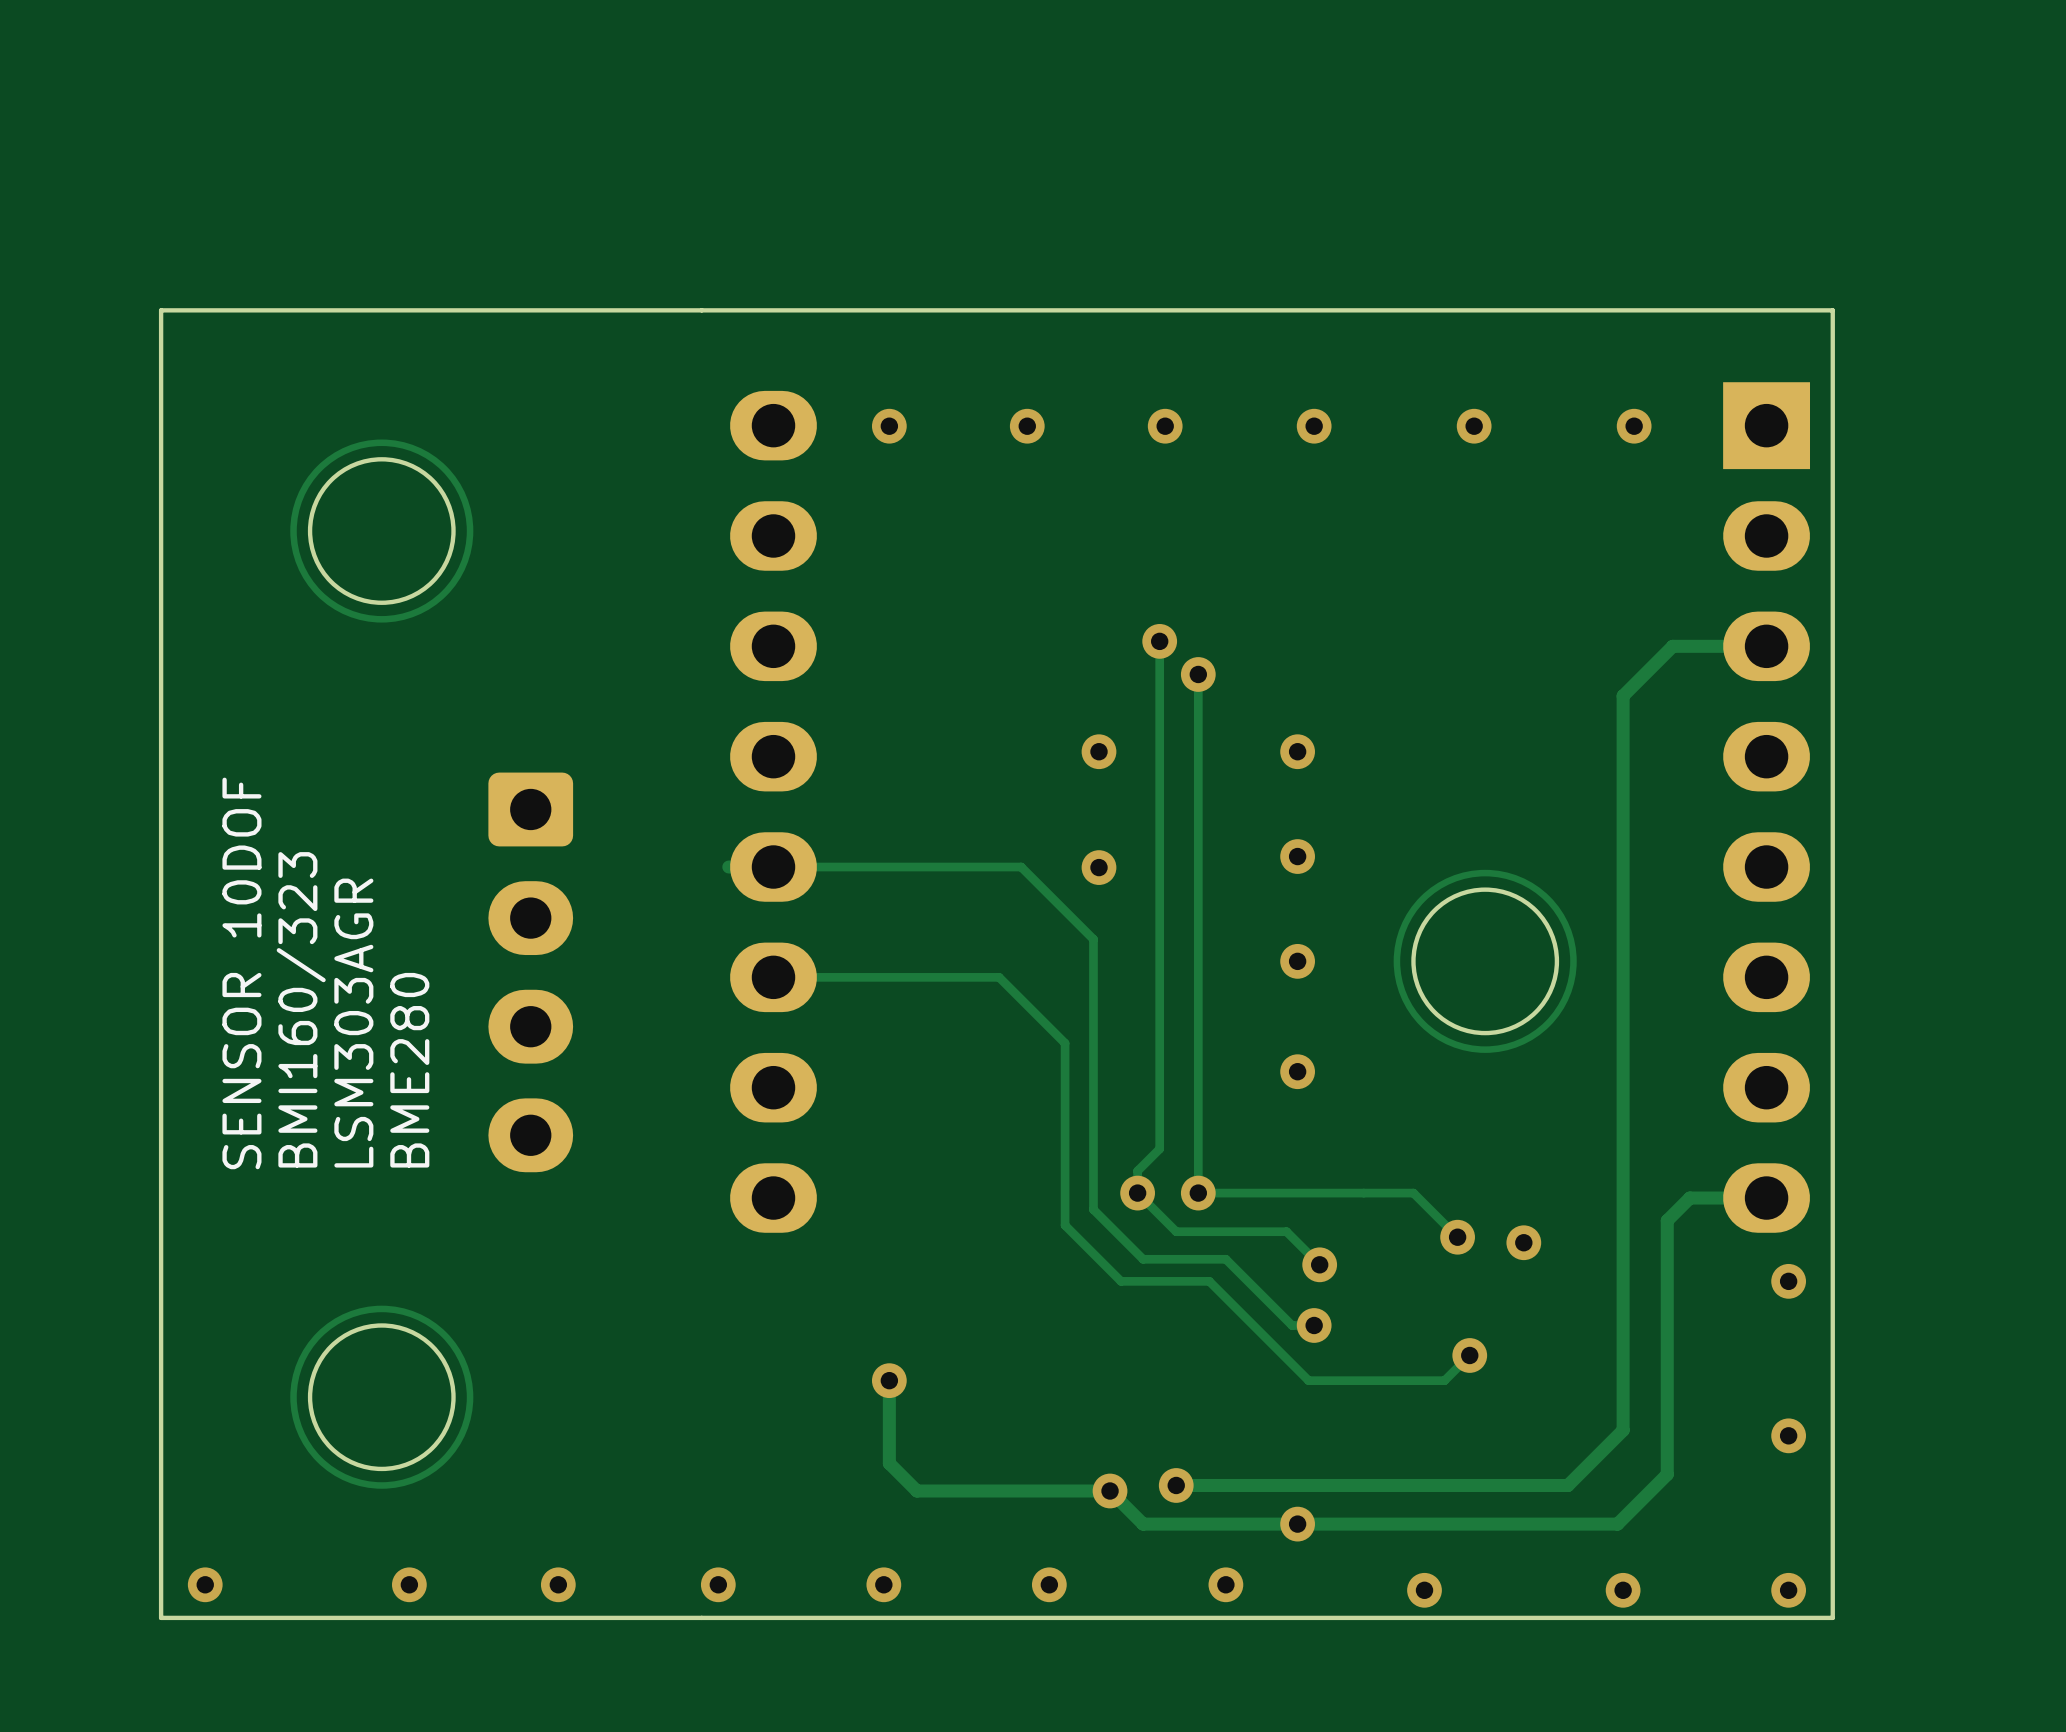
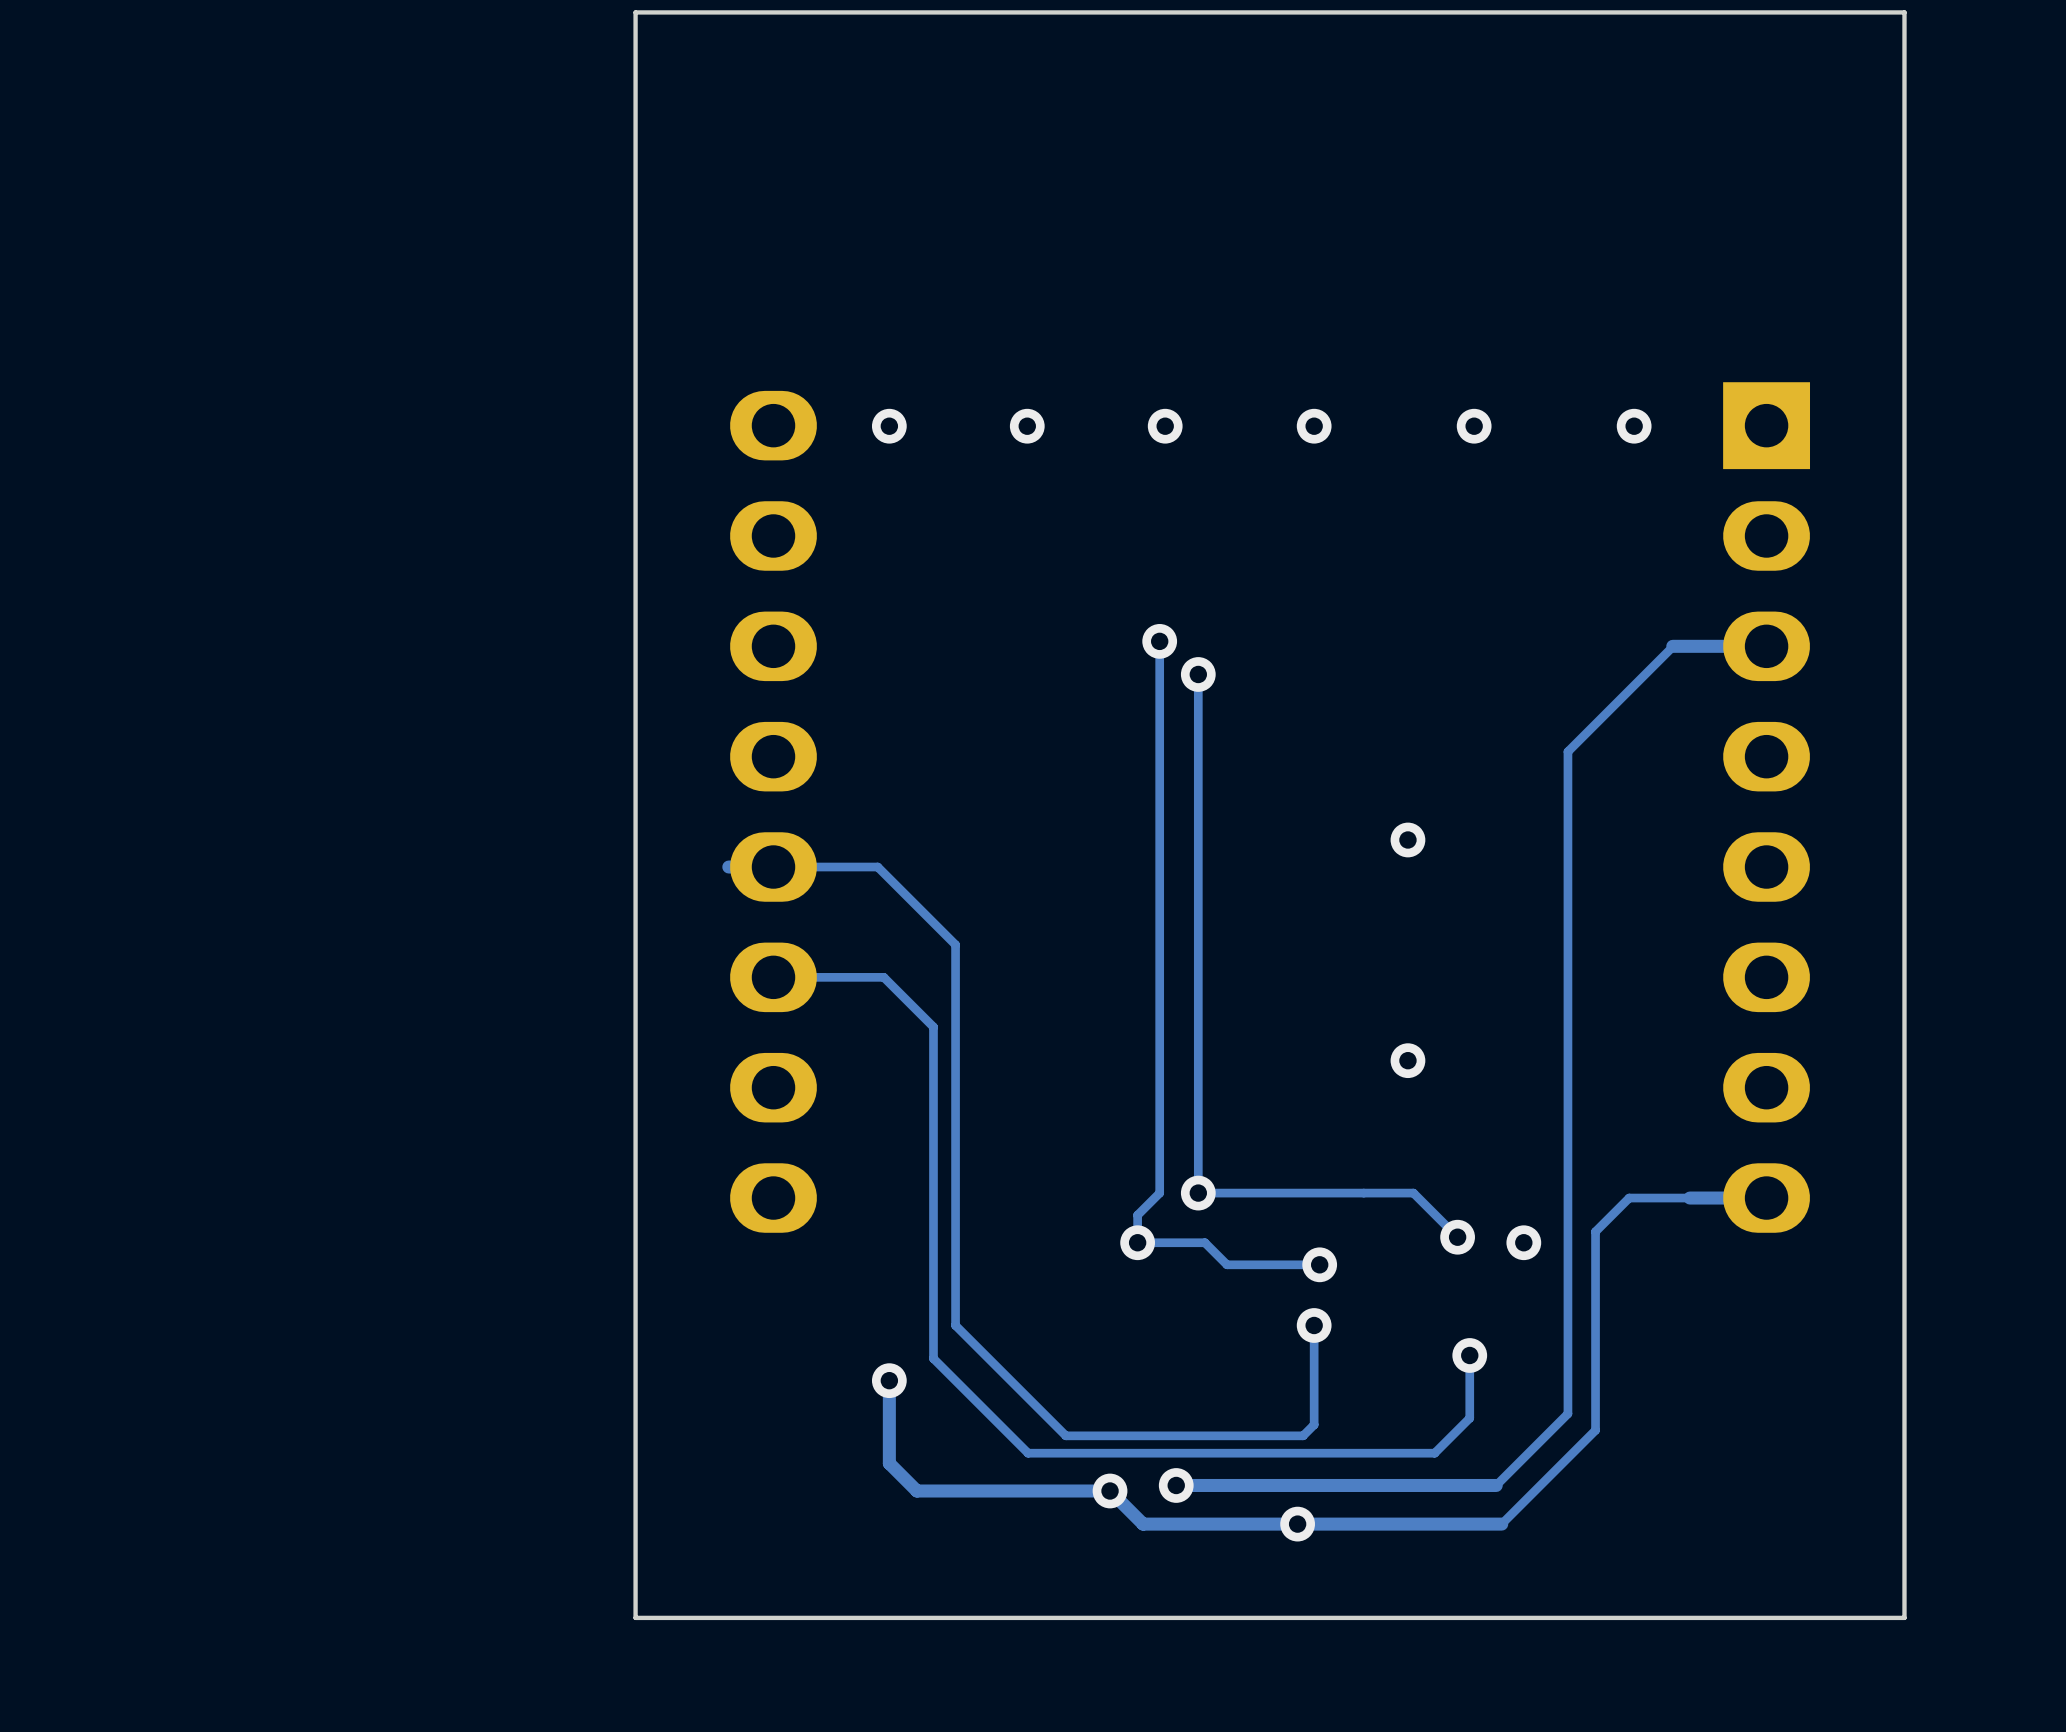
drawing: [290, 439, 474, 623] -> none
round board edge: [307, 457, 456, 605] -> none
track: (1672, 646) (1623, 695) (1623, 1430) (1567, 1485) (1496, 1485) -> (1673, 646) (1567, 751) (1567, 1413) (1496, 1485)
via: (1099, 751) -> none
via: (1297, 751) -> none
via: none -> (1407, 839)
via: (1297, 856) -> none
track: (877, 867) (1021, 867) (1093, 939) (1093, 1209) (1143, 1259) (1225, 1259) (1292, 1325) (1314, 1325) -> (877, 867) (955, 944) (955, 1325) (1065, 1435) (1303, 1435) (1314, 1424) (1314, 1325)
via: (1099, 867) -> none
drawing: [1393, 869, 1577, 1053] -> none
round board edge: [1411, 887, 1560, 1036] -> none
via: (1297, 961) -> none
part: (530, 972) -> none
text: SENSOR 10DOF (241, 973) -> none
track: (883, 977) (999, 977) (1065, 1043) (1065, 1225) (1121, 1281) (1209, 1281) (1308, 1380) (1444, 1380) (1469, 1355) -> (883, 977) (933, 1027) (933, 1358) (1028, 1453) (1434, 1453) (1469, 1418) (1469, 1355)
text: BMI160/323 (301, 1009) -> none
text: LSM303AGR (353, 1023) -> none
via: none -> (1407, 1060)
text: BME280 (409, 1070) -> none
via: (1297, 1071) -> none
track: (1159, 1148) (1137, 1171) (1137, 1193) (1176, 1231) (1286, 1231) (1319, 1264) -> (1159, 1148) (1159, 1193) (1137, 1215) (1137, 1242) (1204, 1242) (1227, 1264) (1319, 1264)
via position: (1137, 1193) -> (1137, 1242)
track: (1689, 1198) (1667, 1220) (1667, 1474) (1617, 1524) (1501, 1524) -> (1689, 1198) (1629, 1198) (1595, 1231) (1595, 1430) (1501, 1524)
via: (1788, 1281) -> none
drawing: [290, 1305, 474, 1489] -> none
round board edge: [307, 1323, 456, 1472] -> none
via: (1788, 1435) -> none
via: (205, 1584) -> none
via: (409, 1584) -> none
via: (558, 1584) -> none
via: (718, 1584) -> none
via: (883, 1584) -> none
via: (1049, 1584) -> none
via: (1225, 1584) -> none
via: (1424, 1590) -> none
via: (1623, 1590) -> none
via: (1788, 1590) -> none
board edge: (1832, 1617) (1832, 310) (161, 310) (161, 1617) (635, 1617) -> (1832, 1617) (1904, 1617) (1904, 12) (635, 12) (635, 1617)

